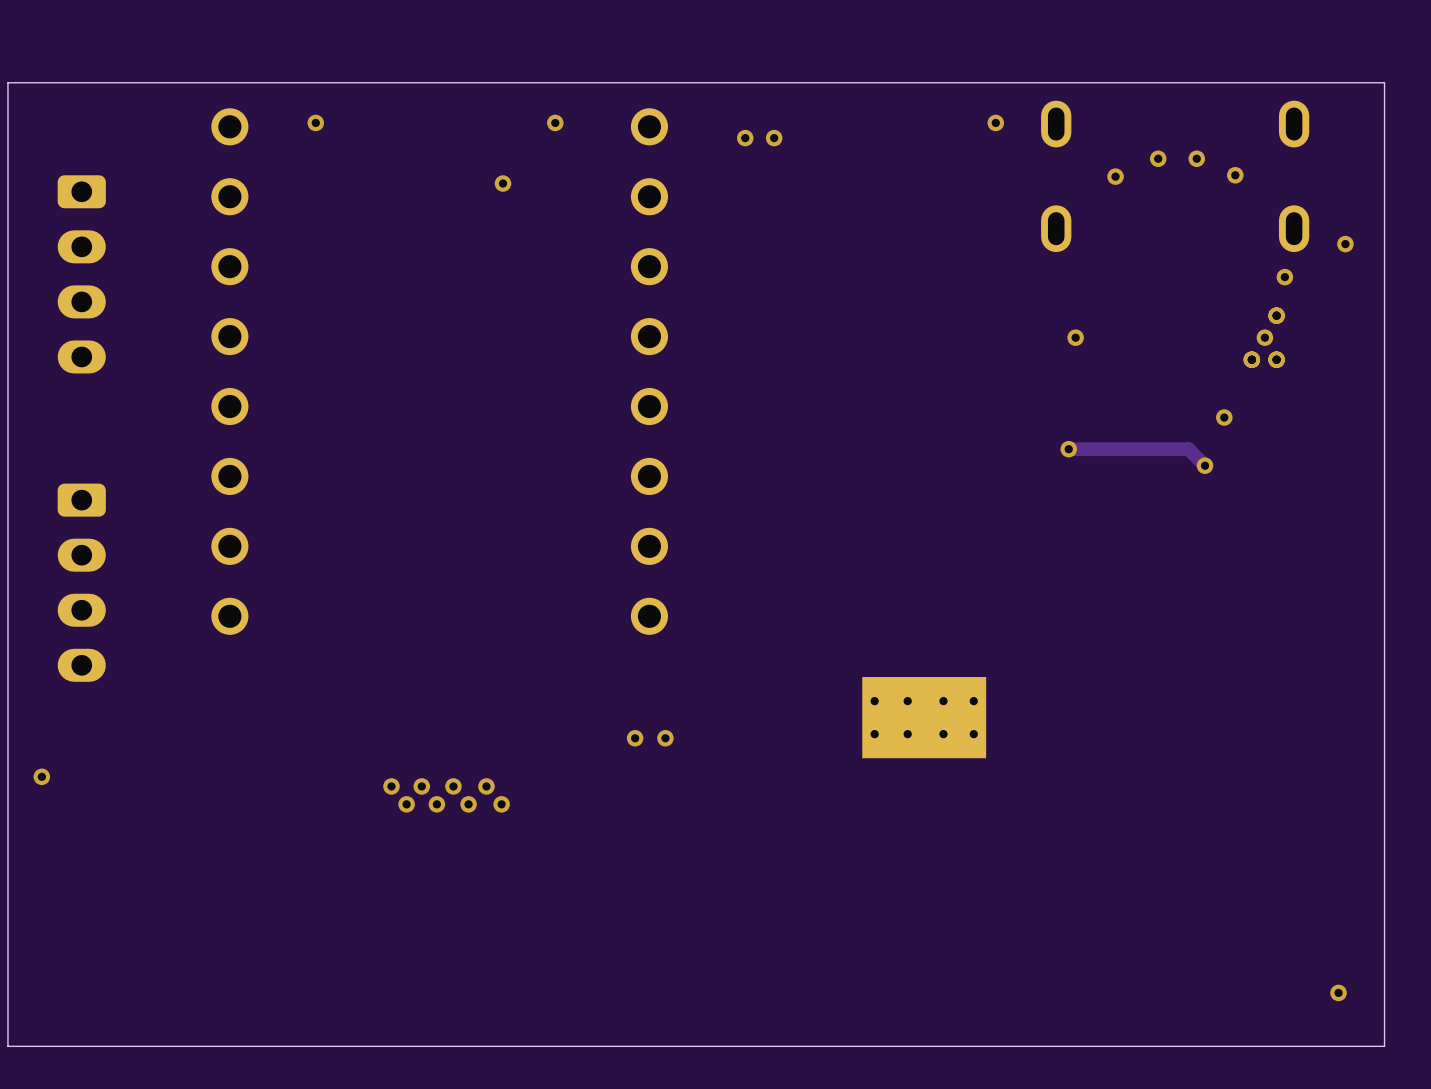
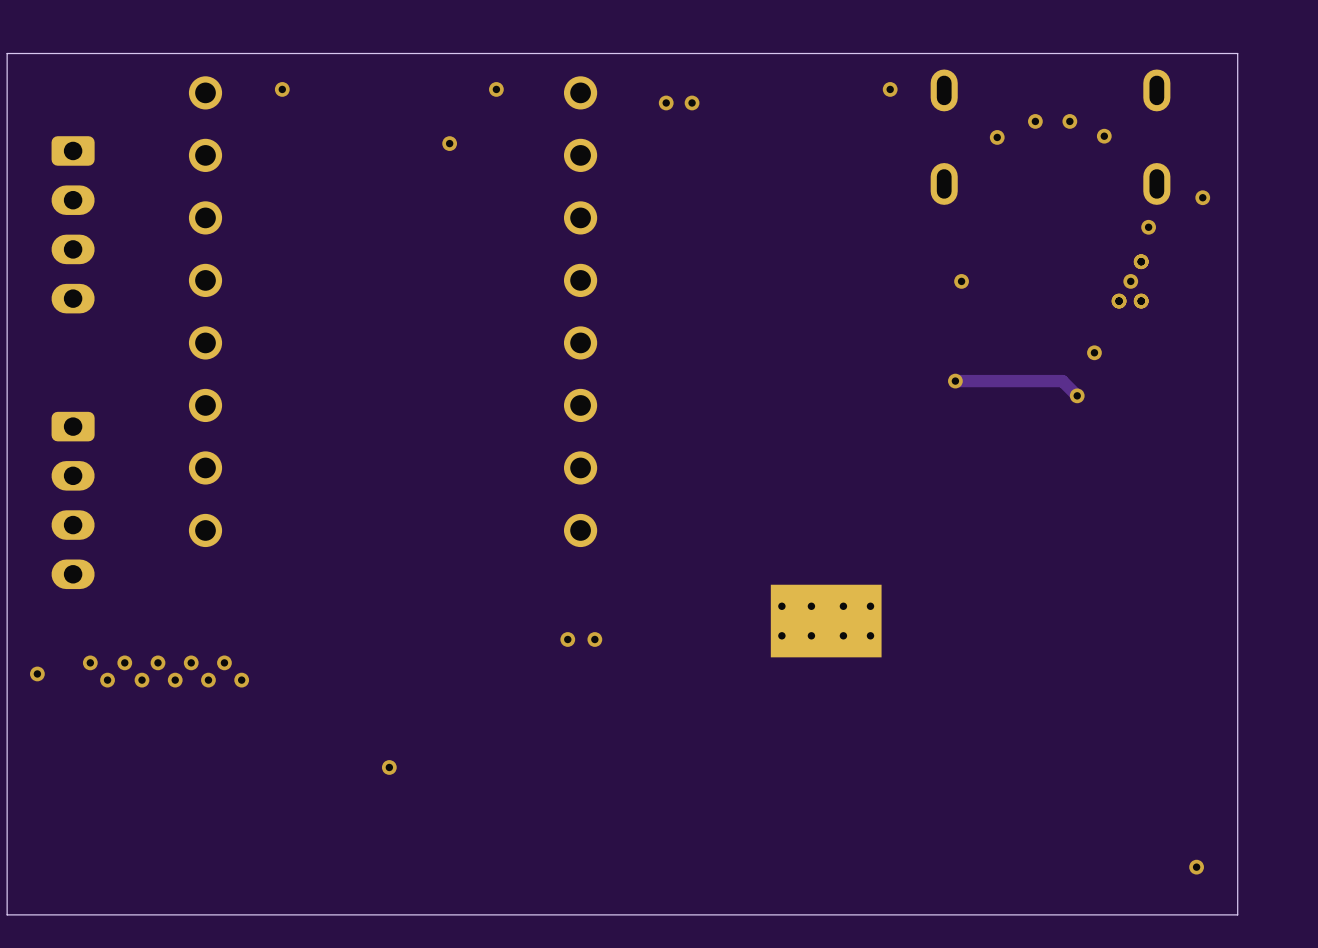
via: none -> (90, 662)
via: none -> (124, 662)
via: none -> (158, 662)
via: none -> (191, 662)
via: none -> (224, 662)
via: none -> (107, 680)
via: none -> (142, 680)
via: none -> (175, 680)
via: none -> (208, 680)
via: none -> (241, 680)
via: (391, 786) -> none
via: (421, 786) -> none
via: (453, 786) -> none
via: (486, 786) -> none
via: (406, 804) -> none
via: (436, 804) -> none
via: (468, 804) -> none
via: (501, 804) -> none
via: none -> (389, 767)

